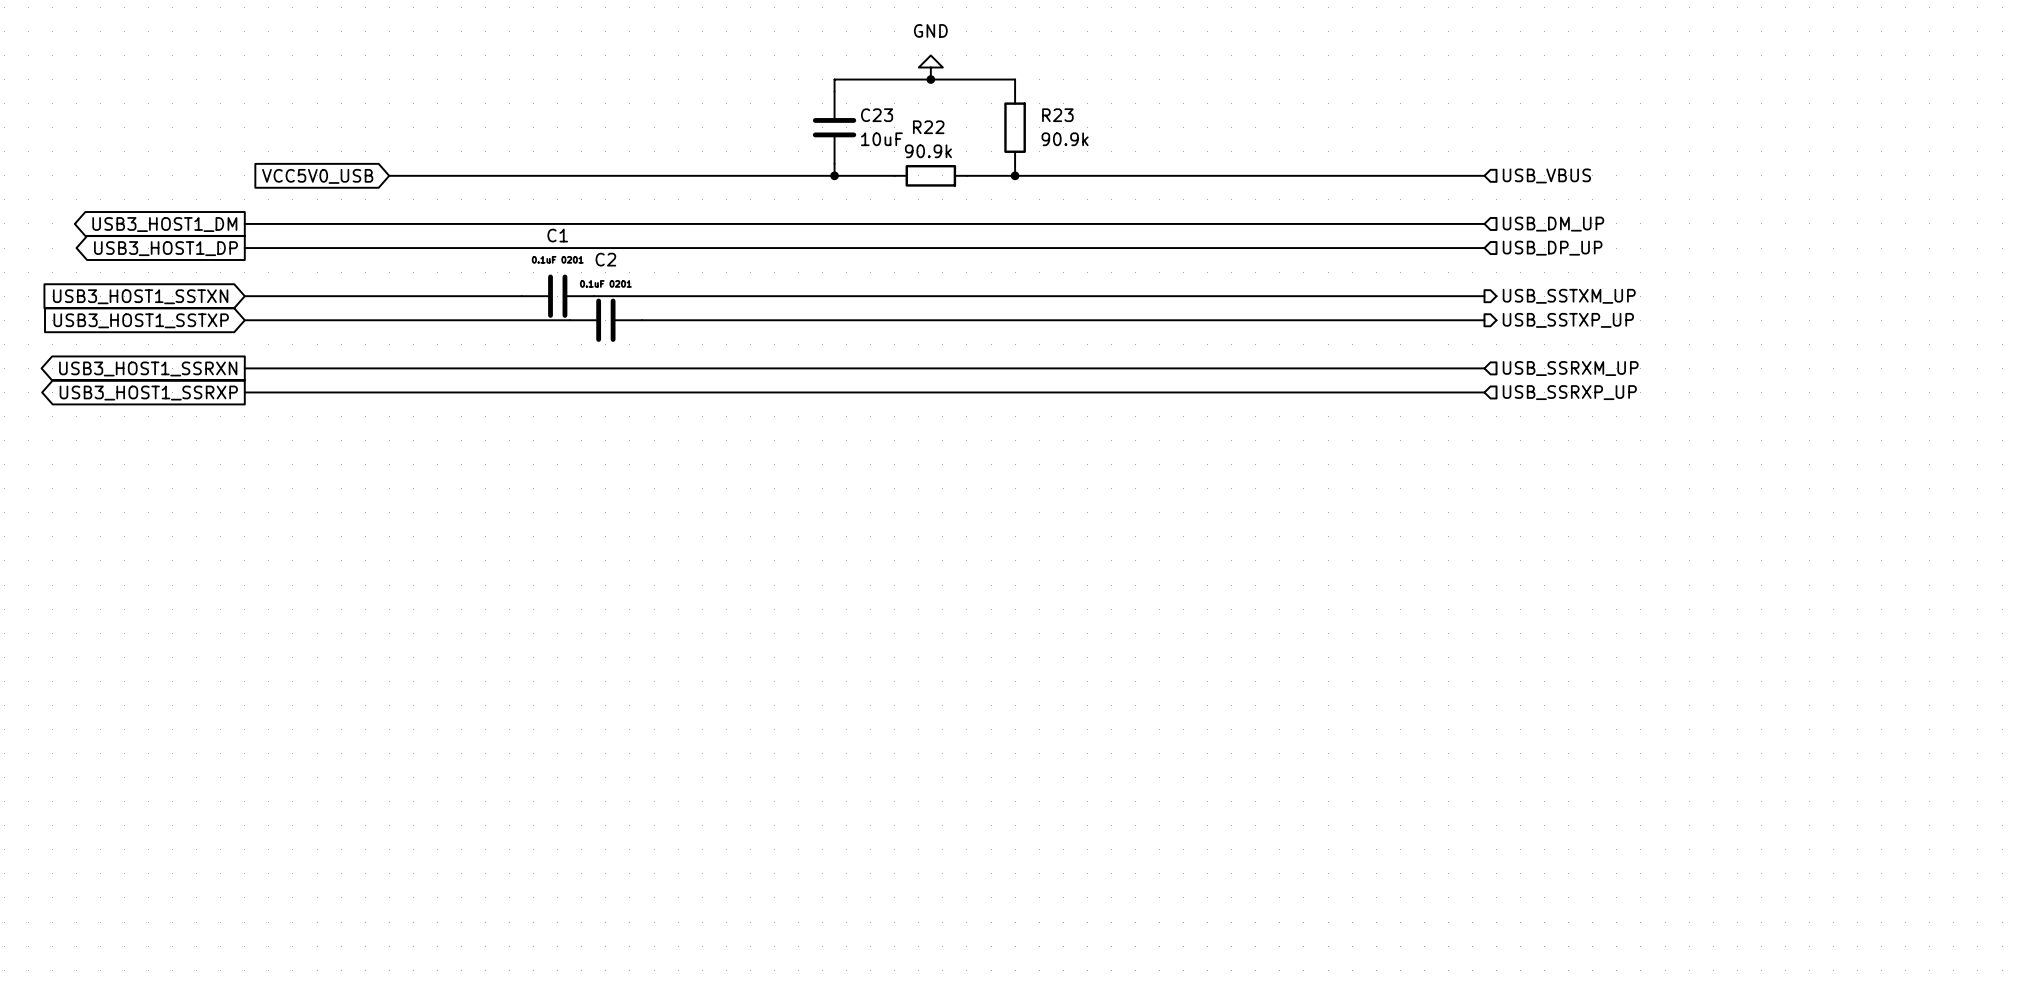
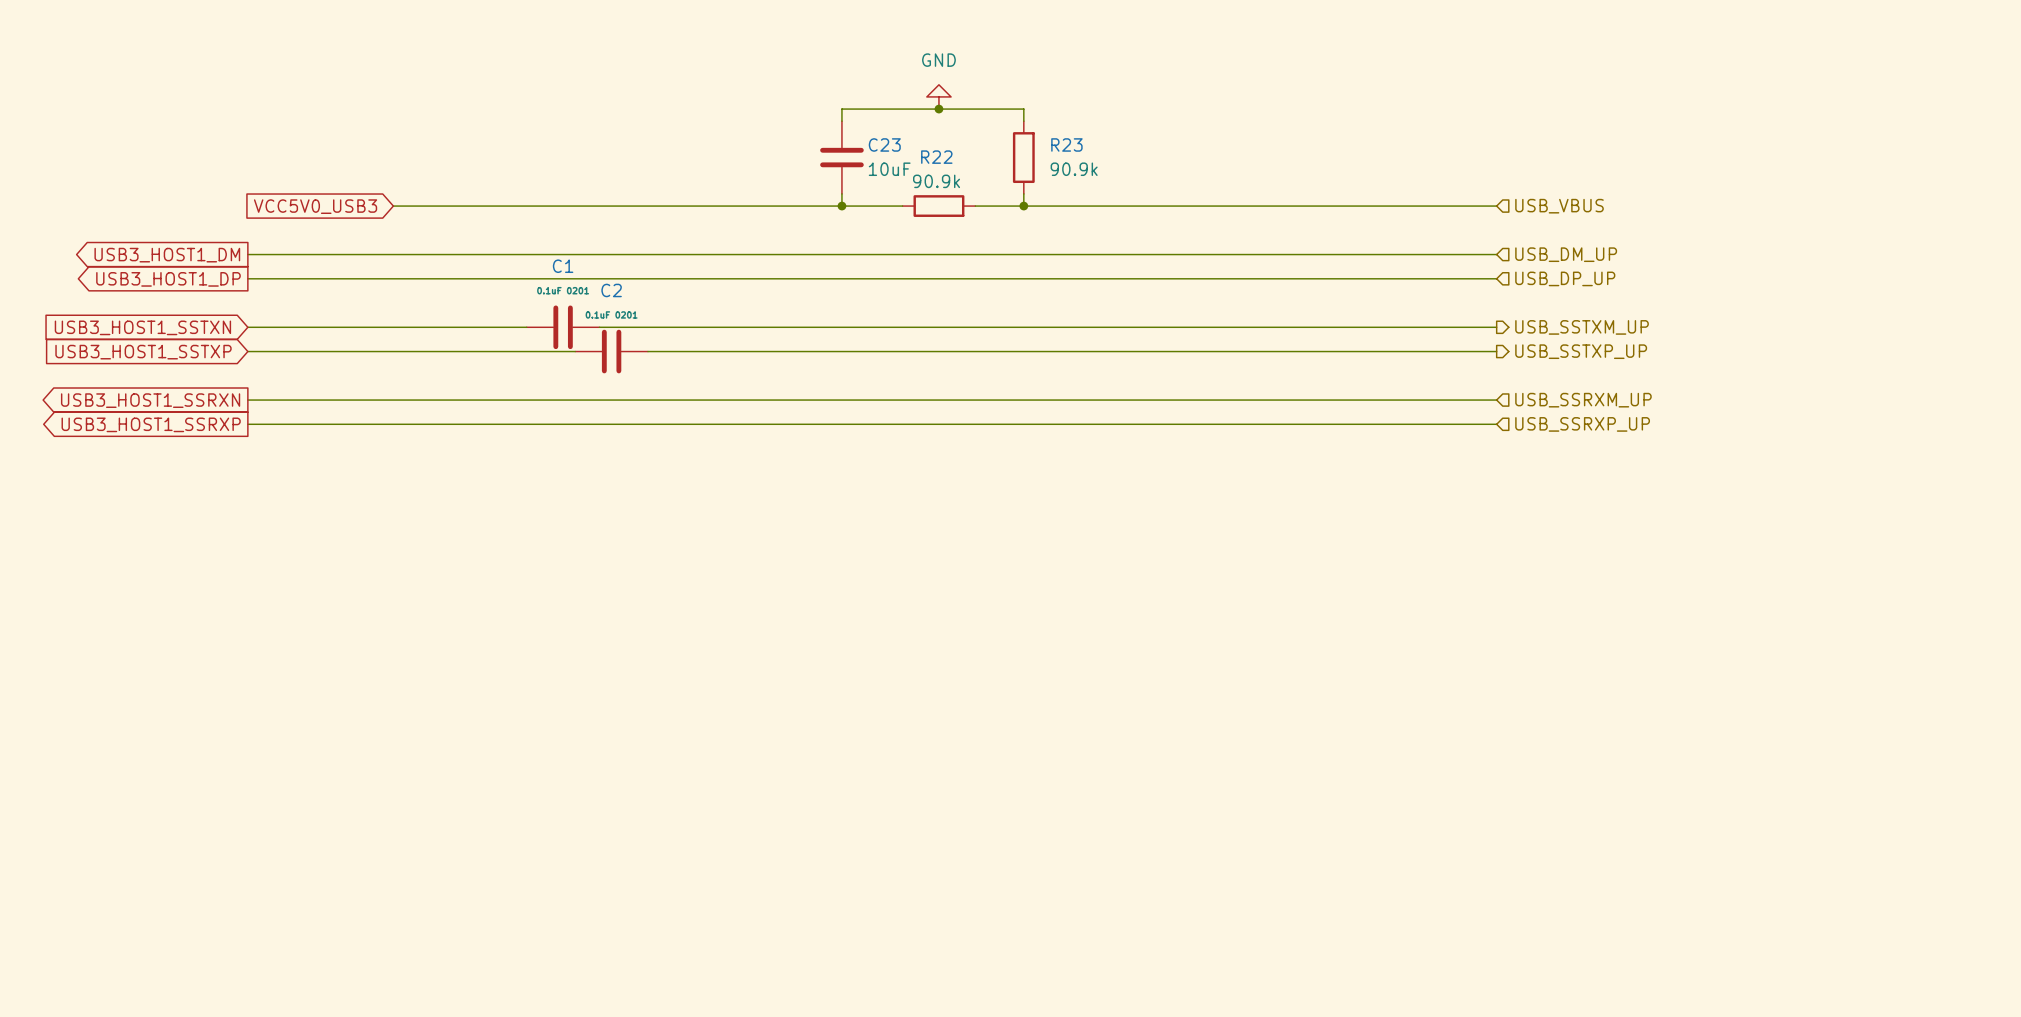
global label: VCC5V0_USB (317, 176) -> VCC5V0_USB3 (315, 206)

